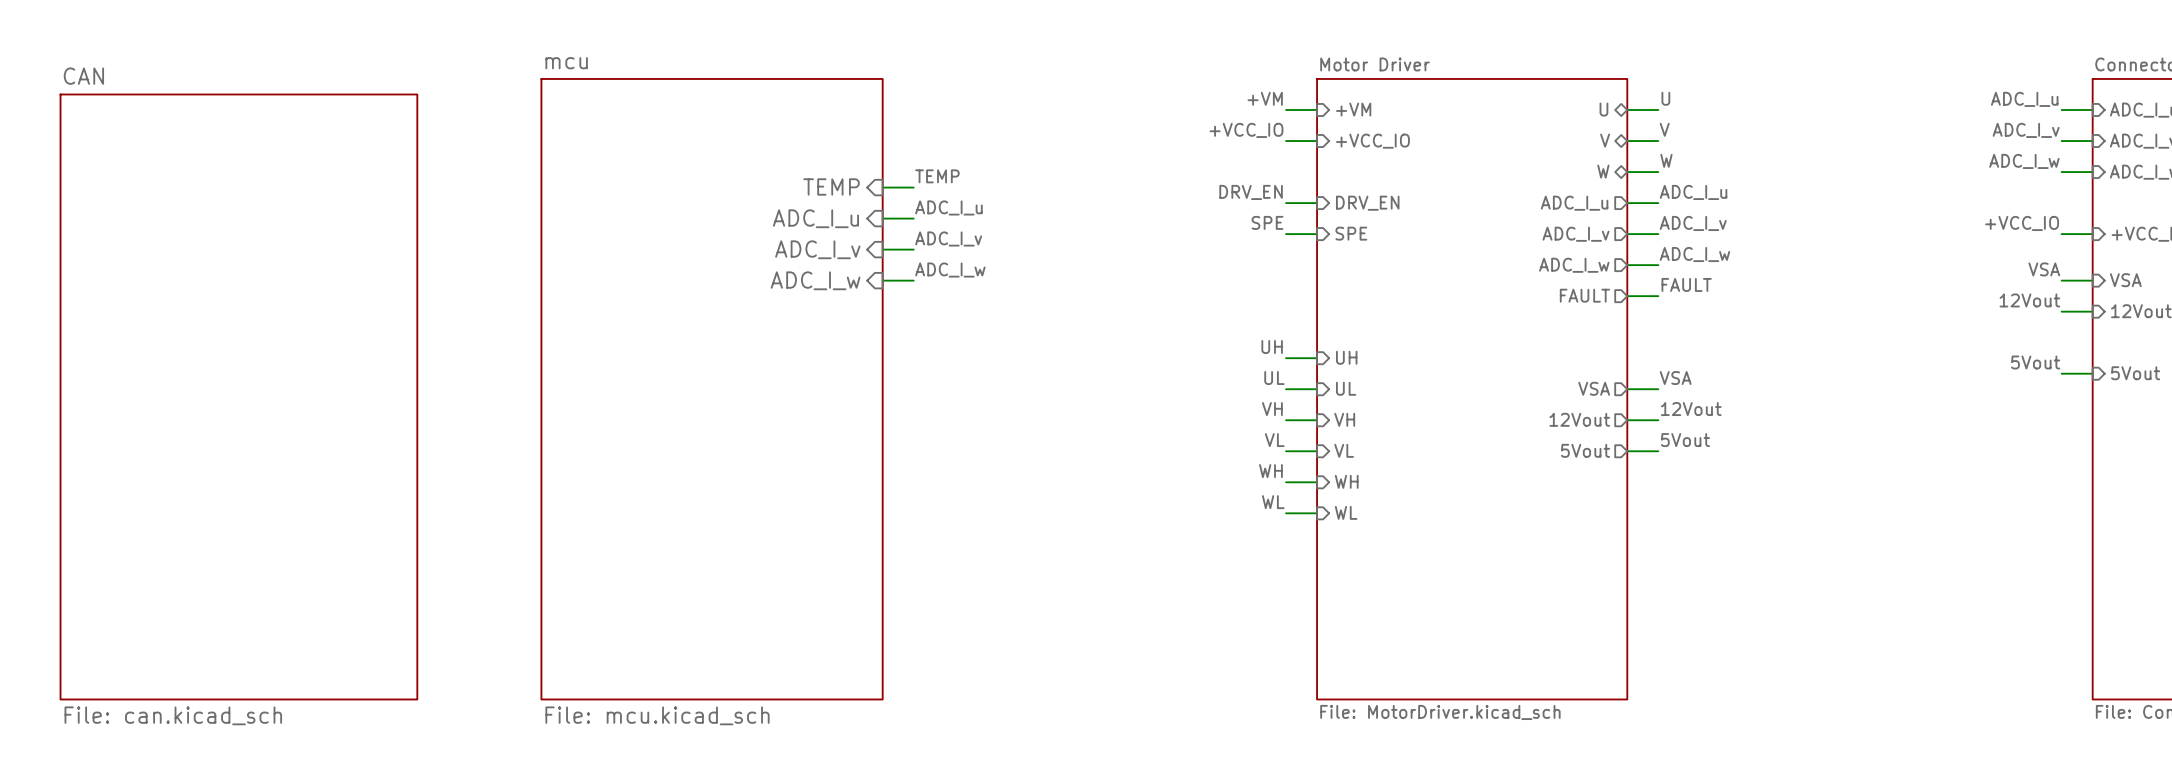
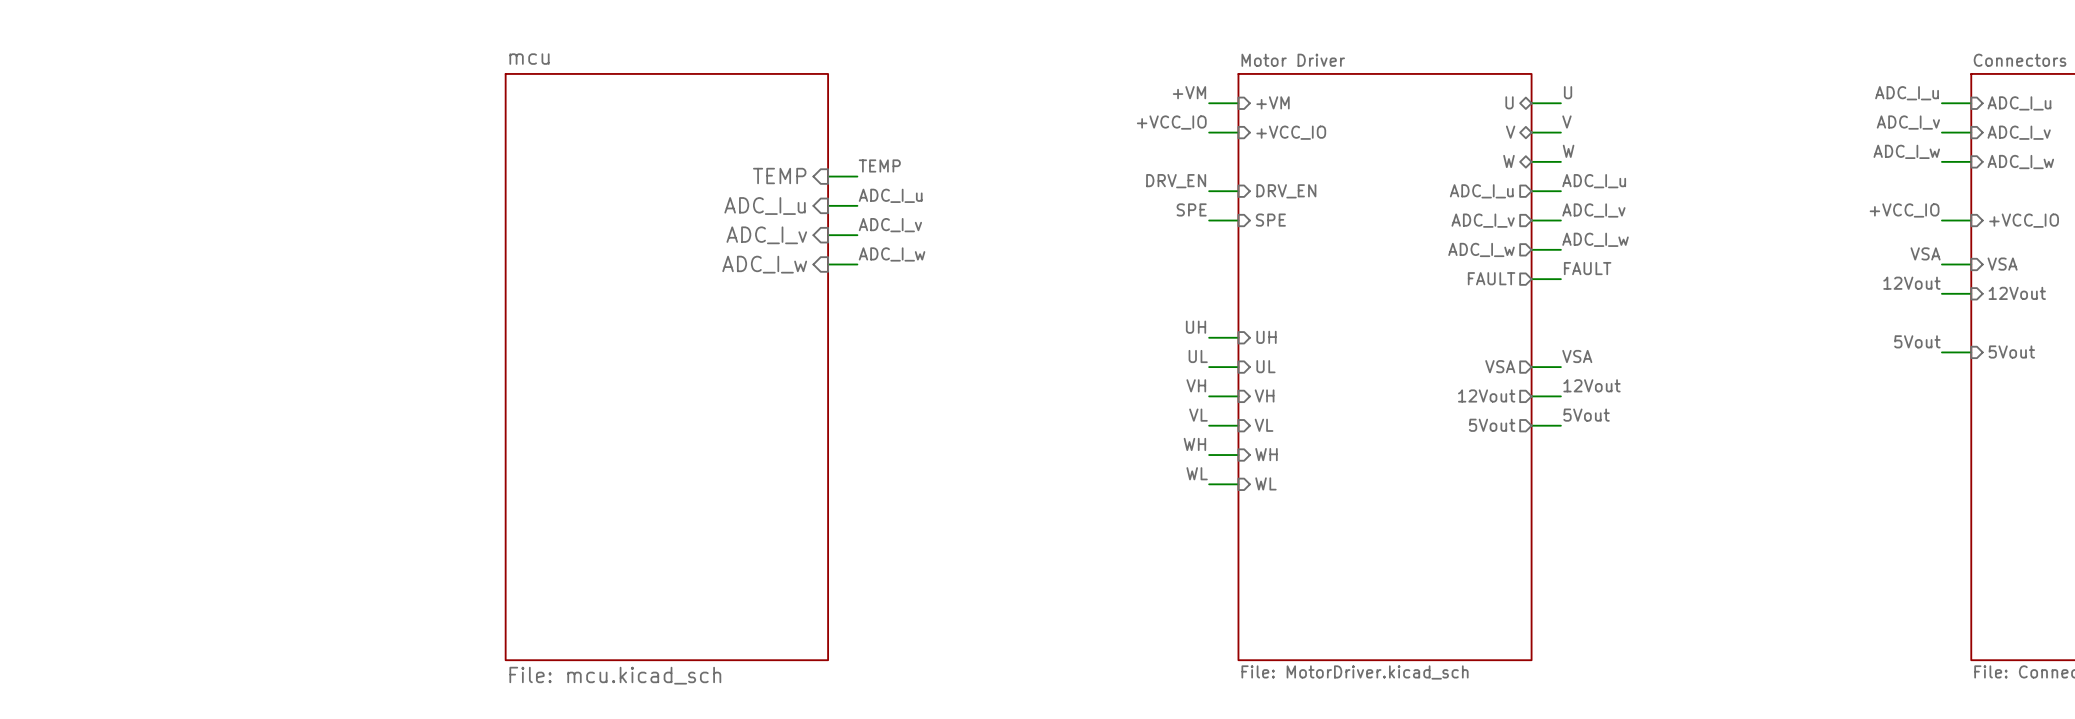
sheet CAN: File: can.kicad_sch (238, 396) -> none

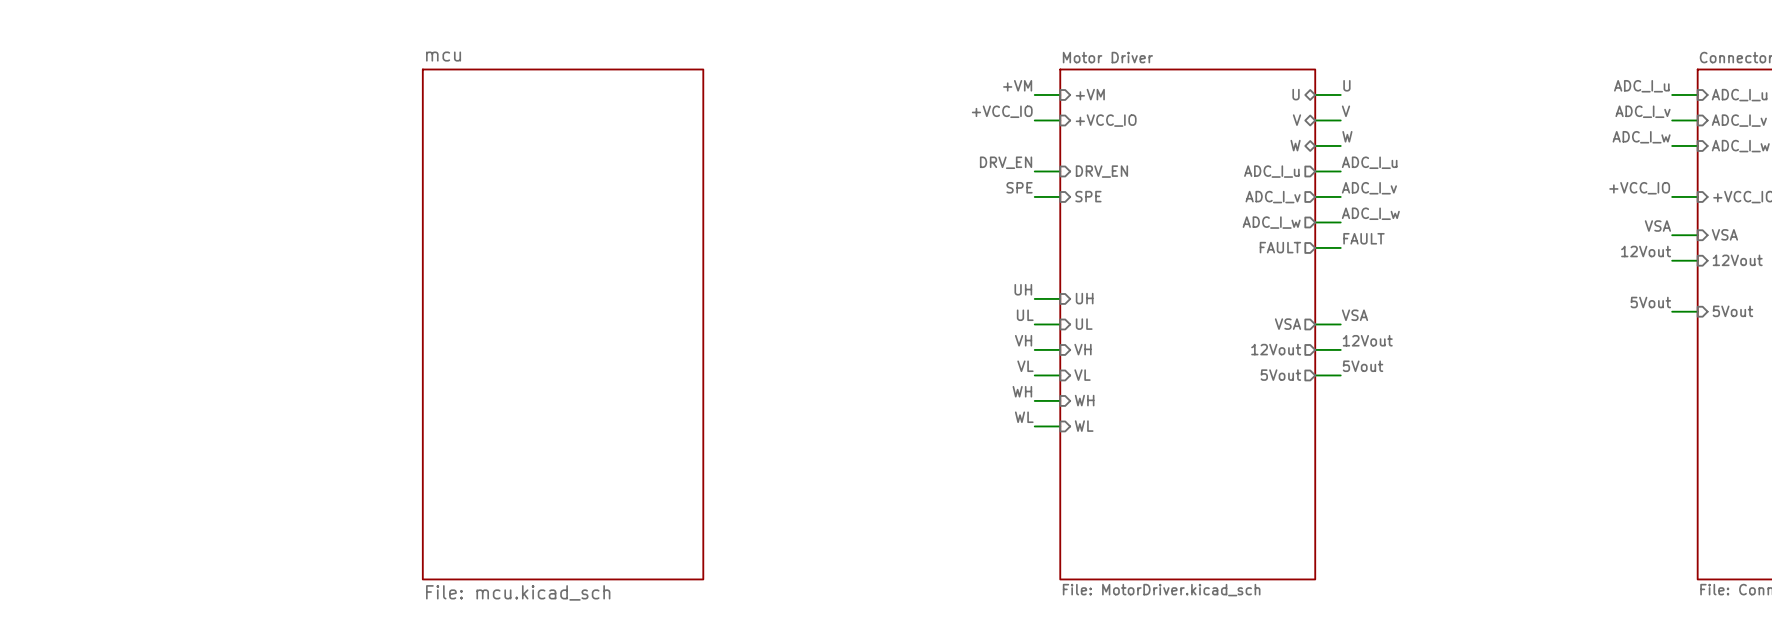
label: TEMP (879, 165) -> none
sheet pin: TEMP (779, 176) -> none
wire: (828, 176) (857, 176) -> none
label: ADC_I_u (890, 195) -> none
wire: (828, 205) (857, 205) -> none
sheet pin: ADC_I_u (765, 206) -> none
label: ADC_I_v (890, 225) -> none
sheet pin: ADC_I_v (766, 235) -> none
wire: (828, 235) (857, 235) -> none
label: ADC_I_w (892, 254) -> none
sheet pin: ADC_I_w (764, 264) -> none
wire: (828, 264) (857, 264) -> none

